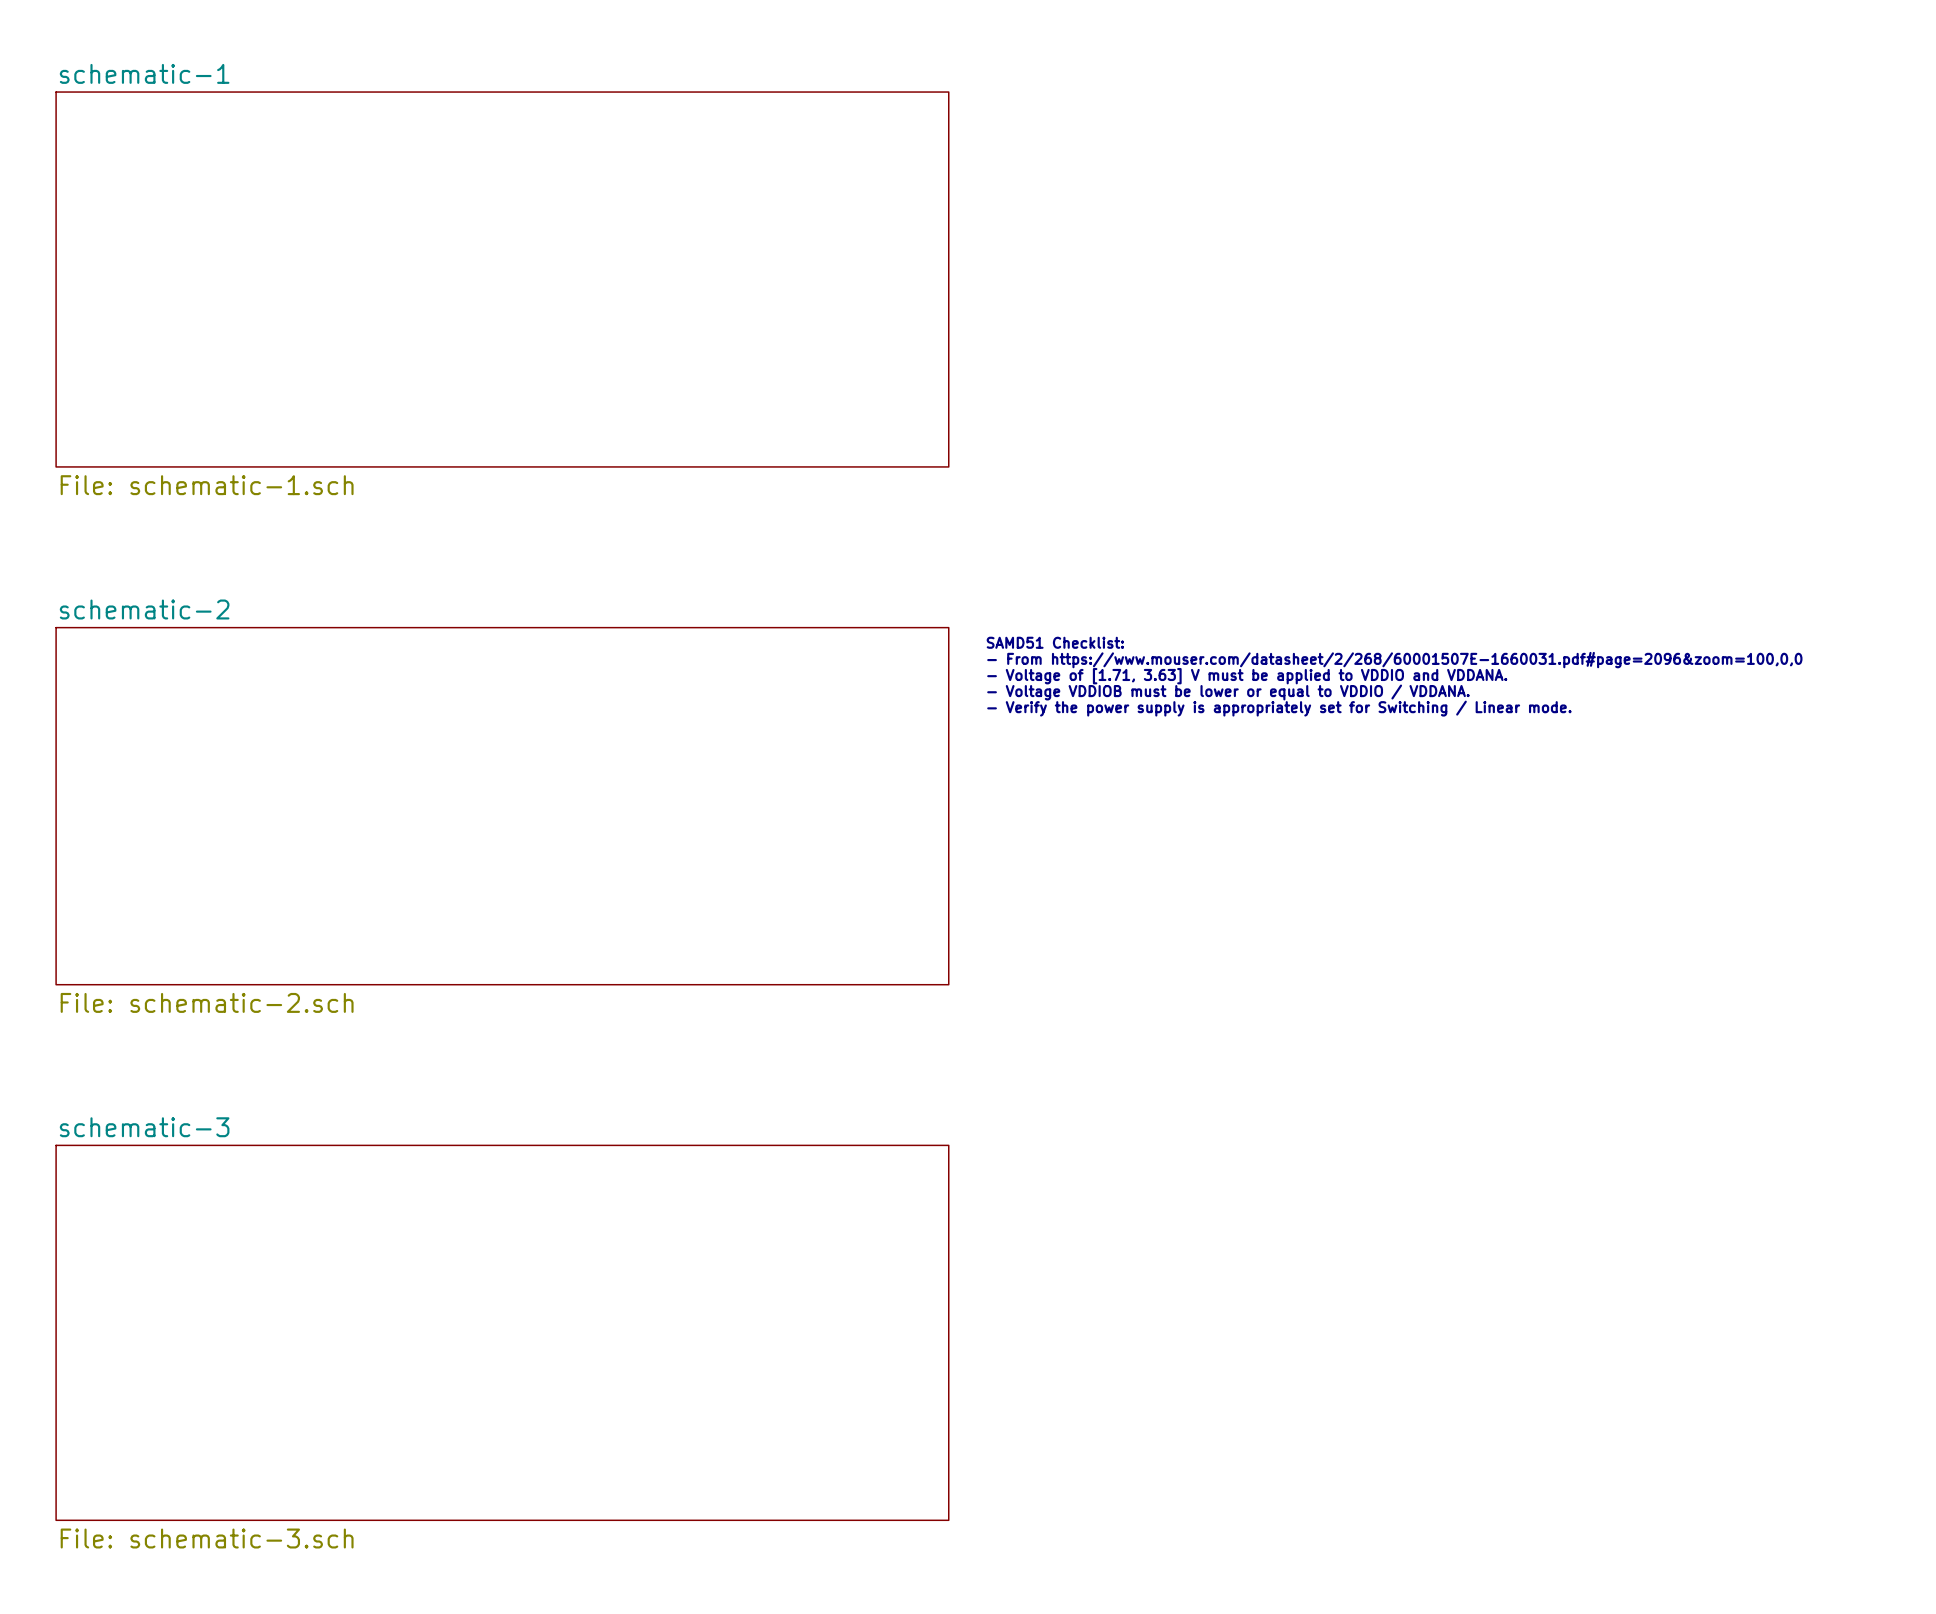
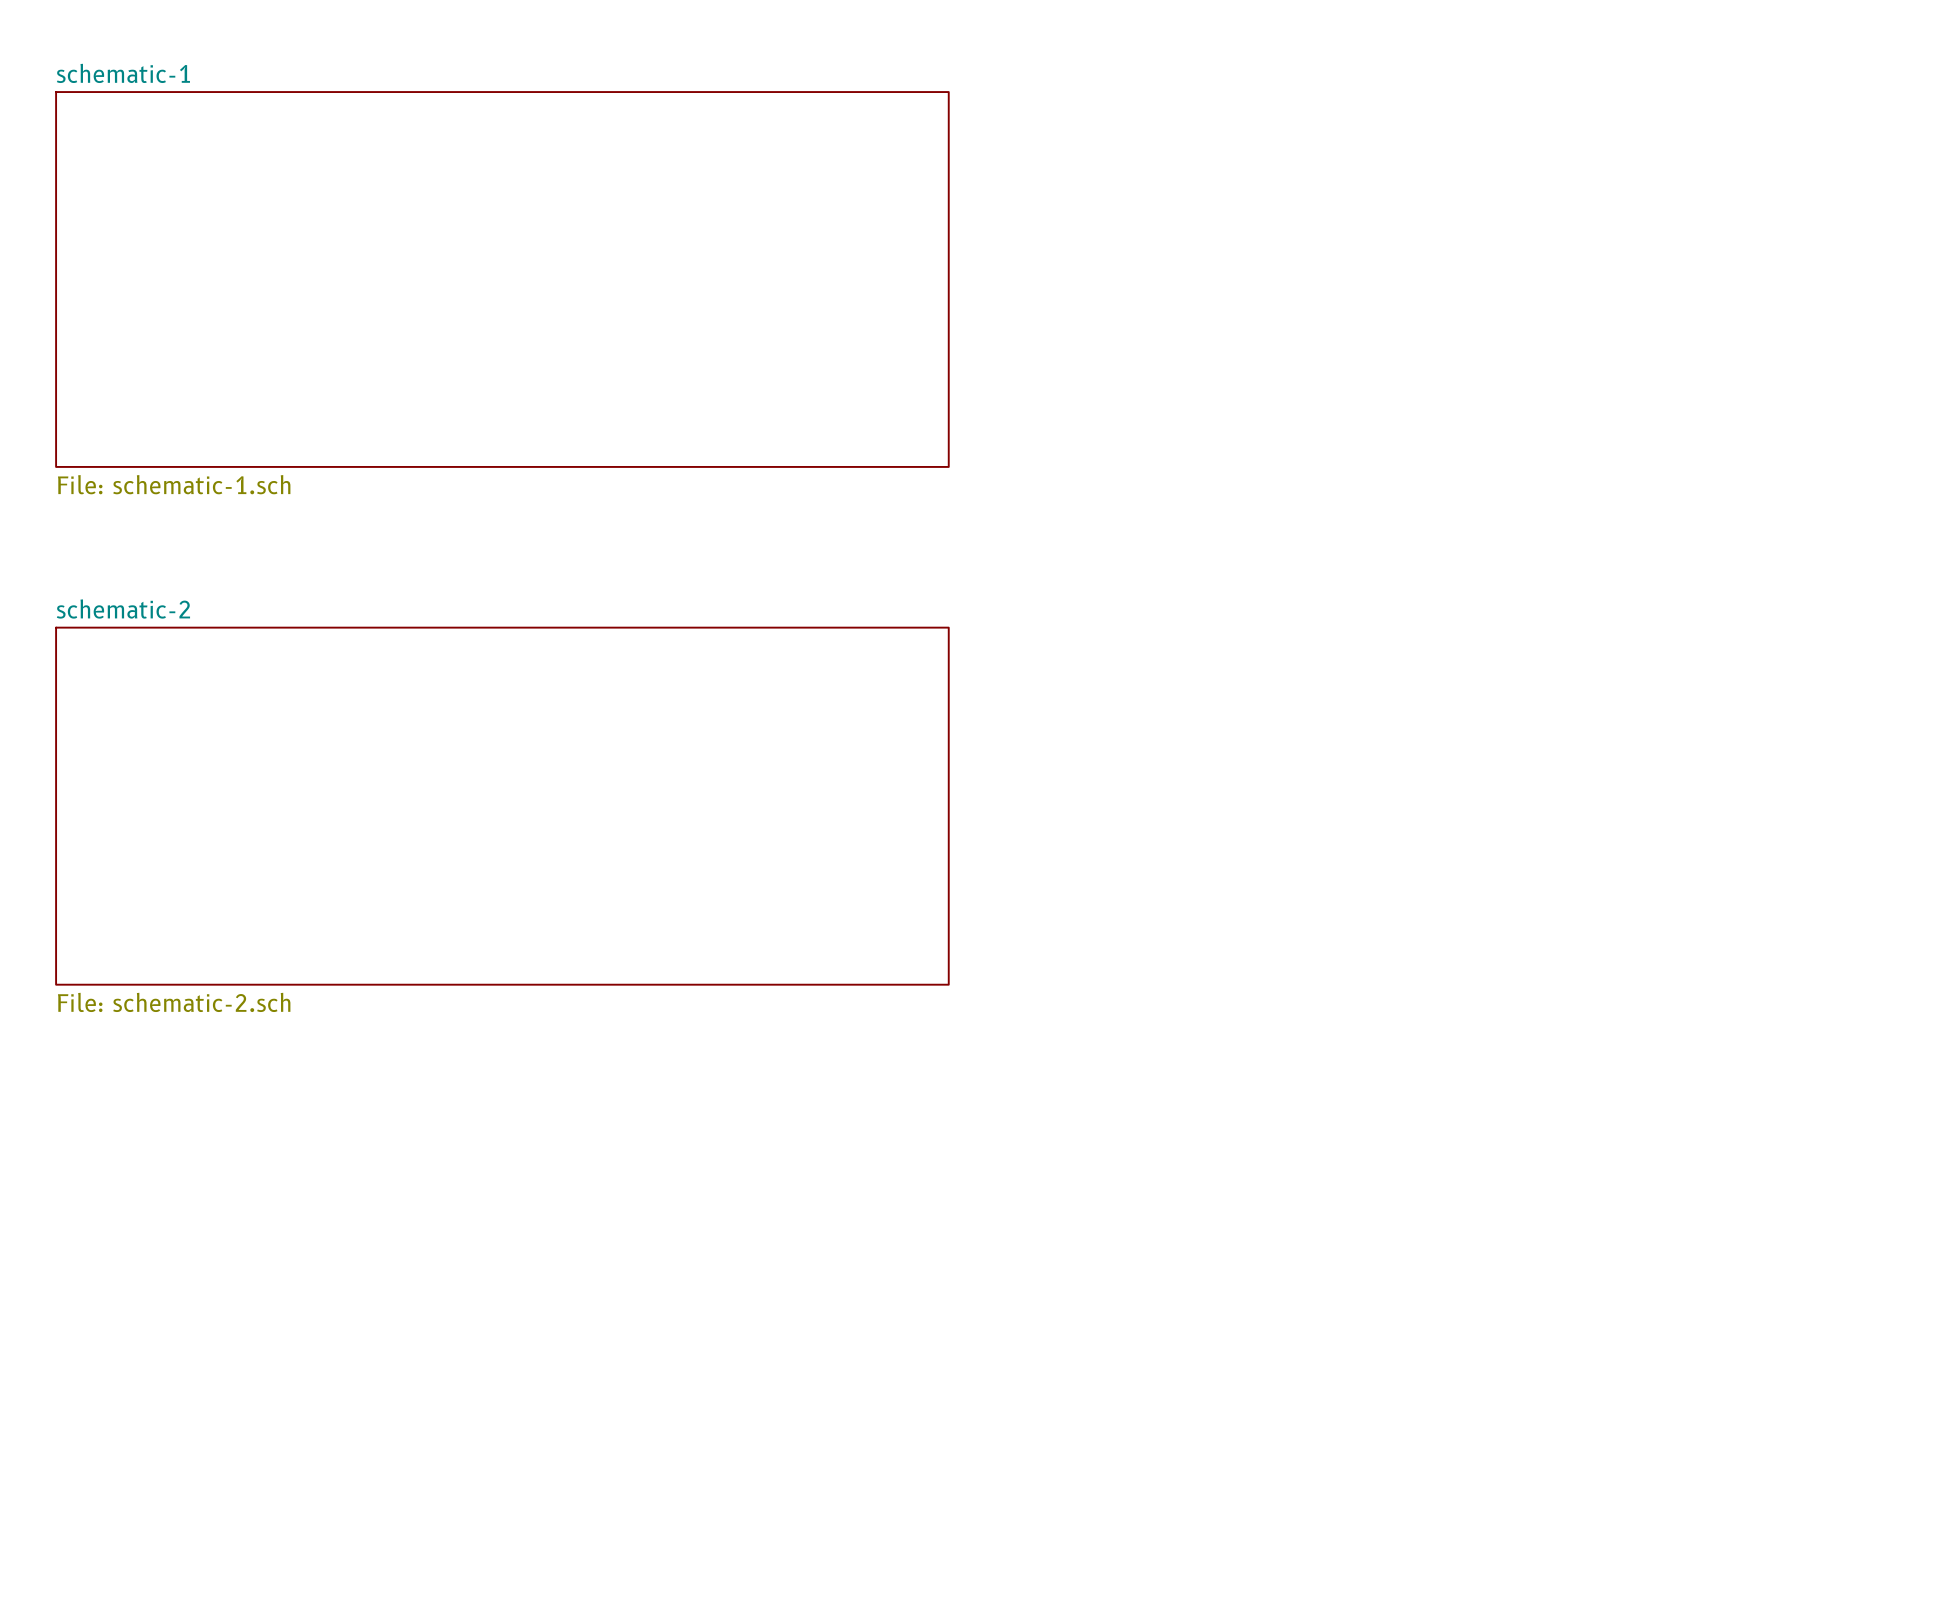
text: SAMD51 Checklist: (1055, 642) -> none
text: - From https://www.mouser.com/datasheet/2/268/60001507E-1660031.pdf#page=2096&zoom=100,0,0 (1394, 660) -> none
text: - Voltage of [1.71, 3.63] V must be applied to VDDIO and VDDANA. (1247, 676) -> none
text: - Voltage VDDIOB must be lower or equal to VDDIO / VDDANA. (1228, 692) -> none
text: - Verify the power supply is appropriately set for Switching / Linear mode. (1279, 708) -> none
sheet schematic-3: File: schematic-3.sch (502, 1332) -> none

